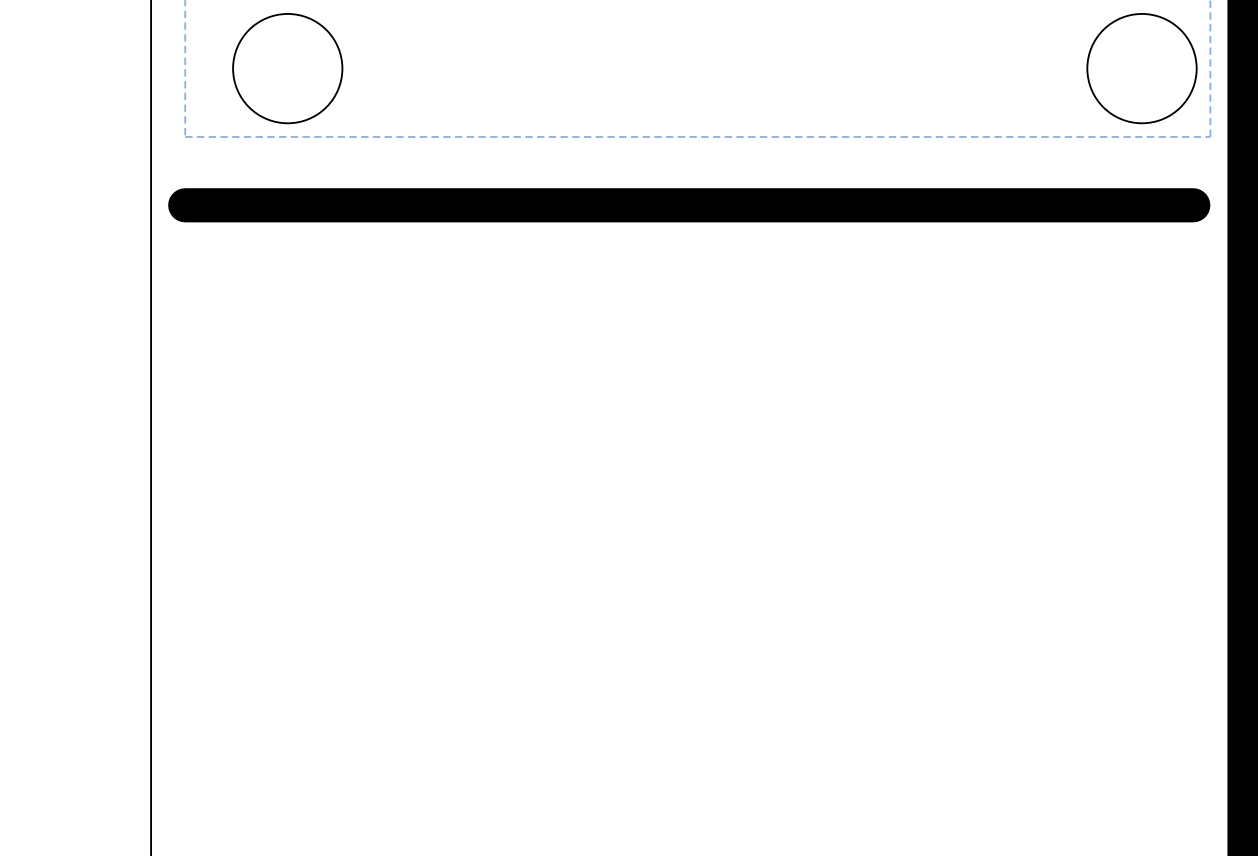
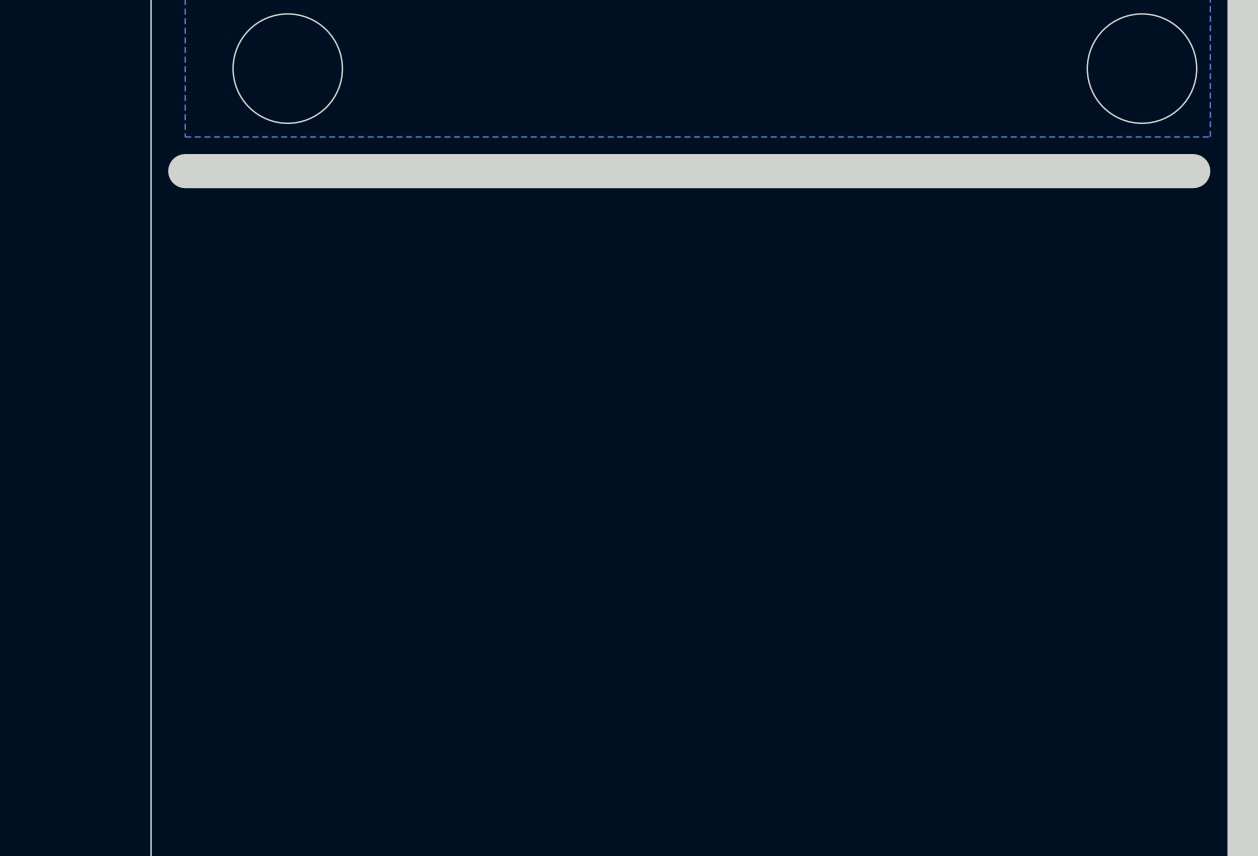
board edge: (1193, 205) (185, 205) -> (1193, 171) (185, 171)

